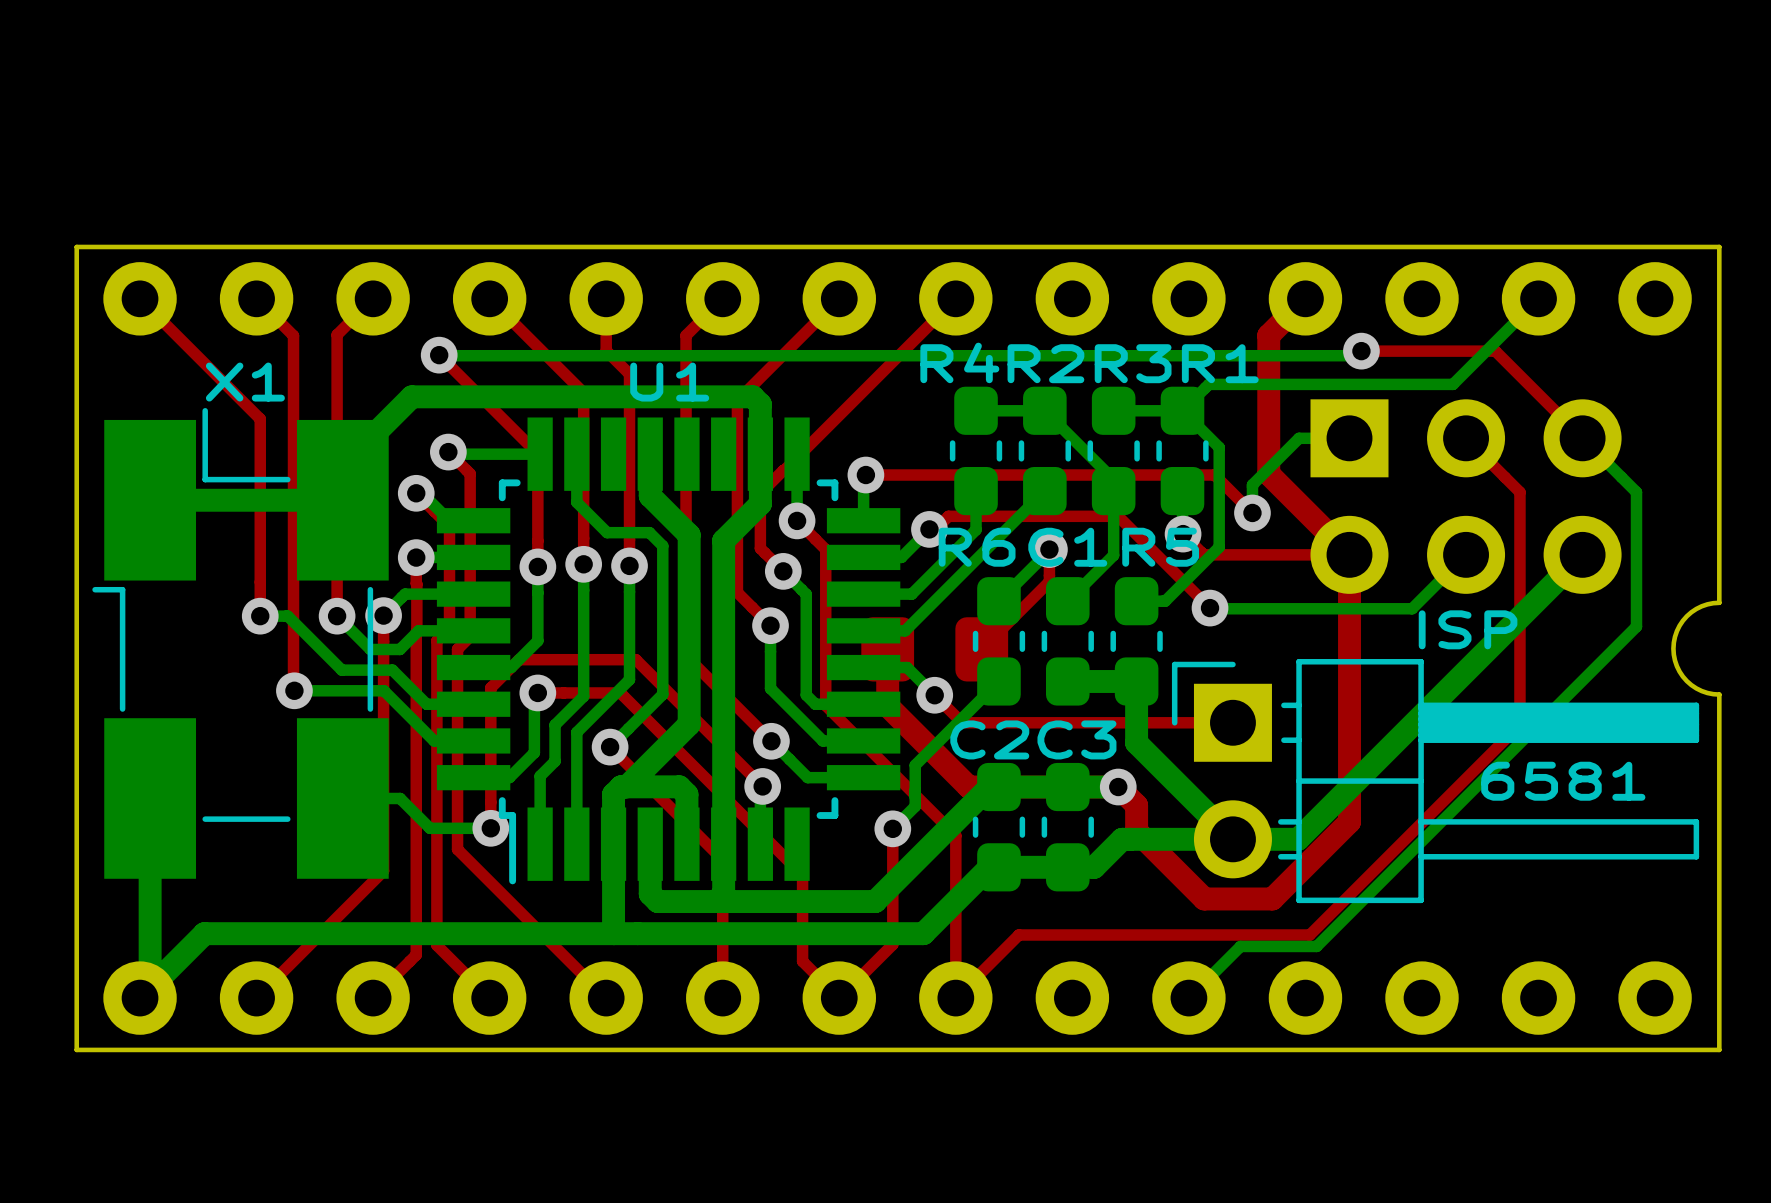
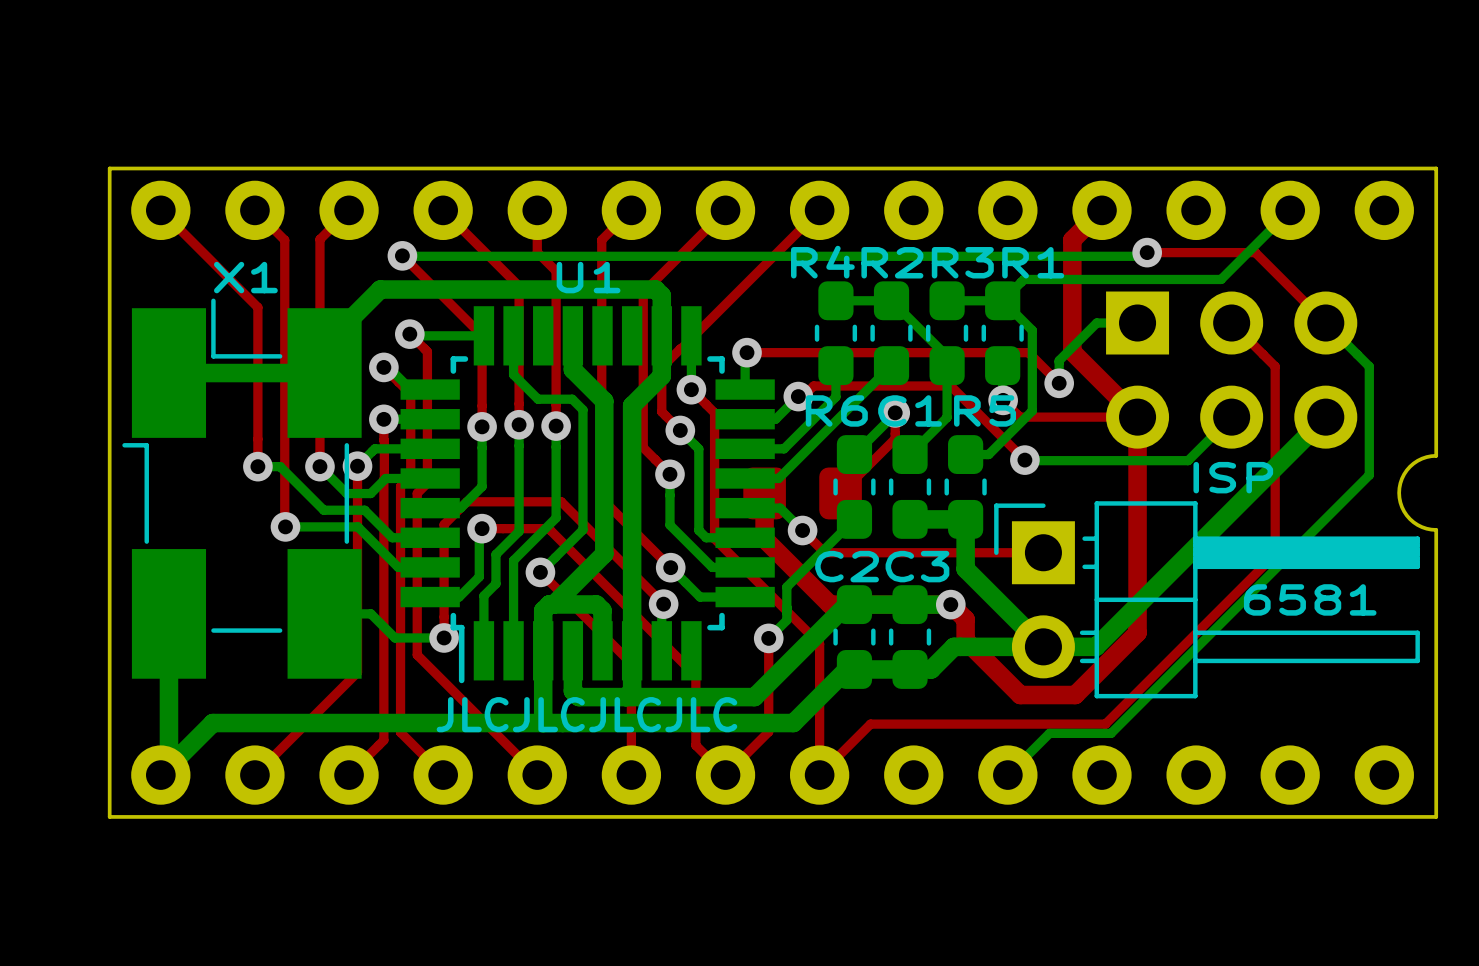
text: none -> JLCJLCJLCJLC (586, 714)

